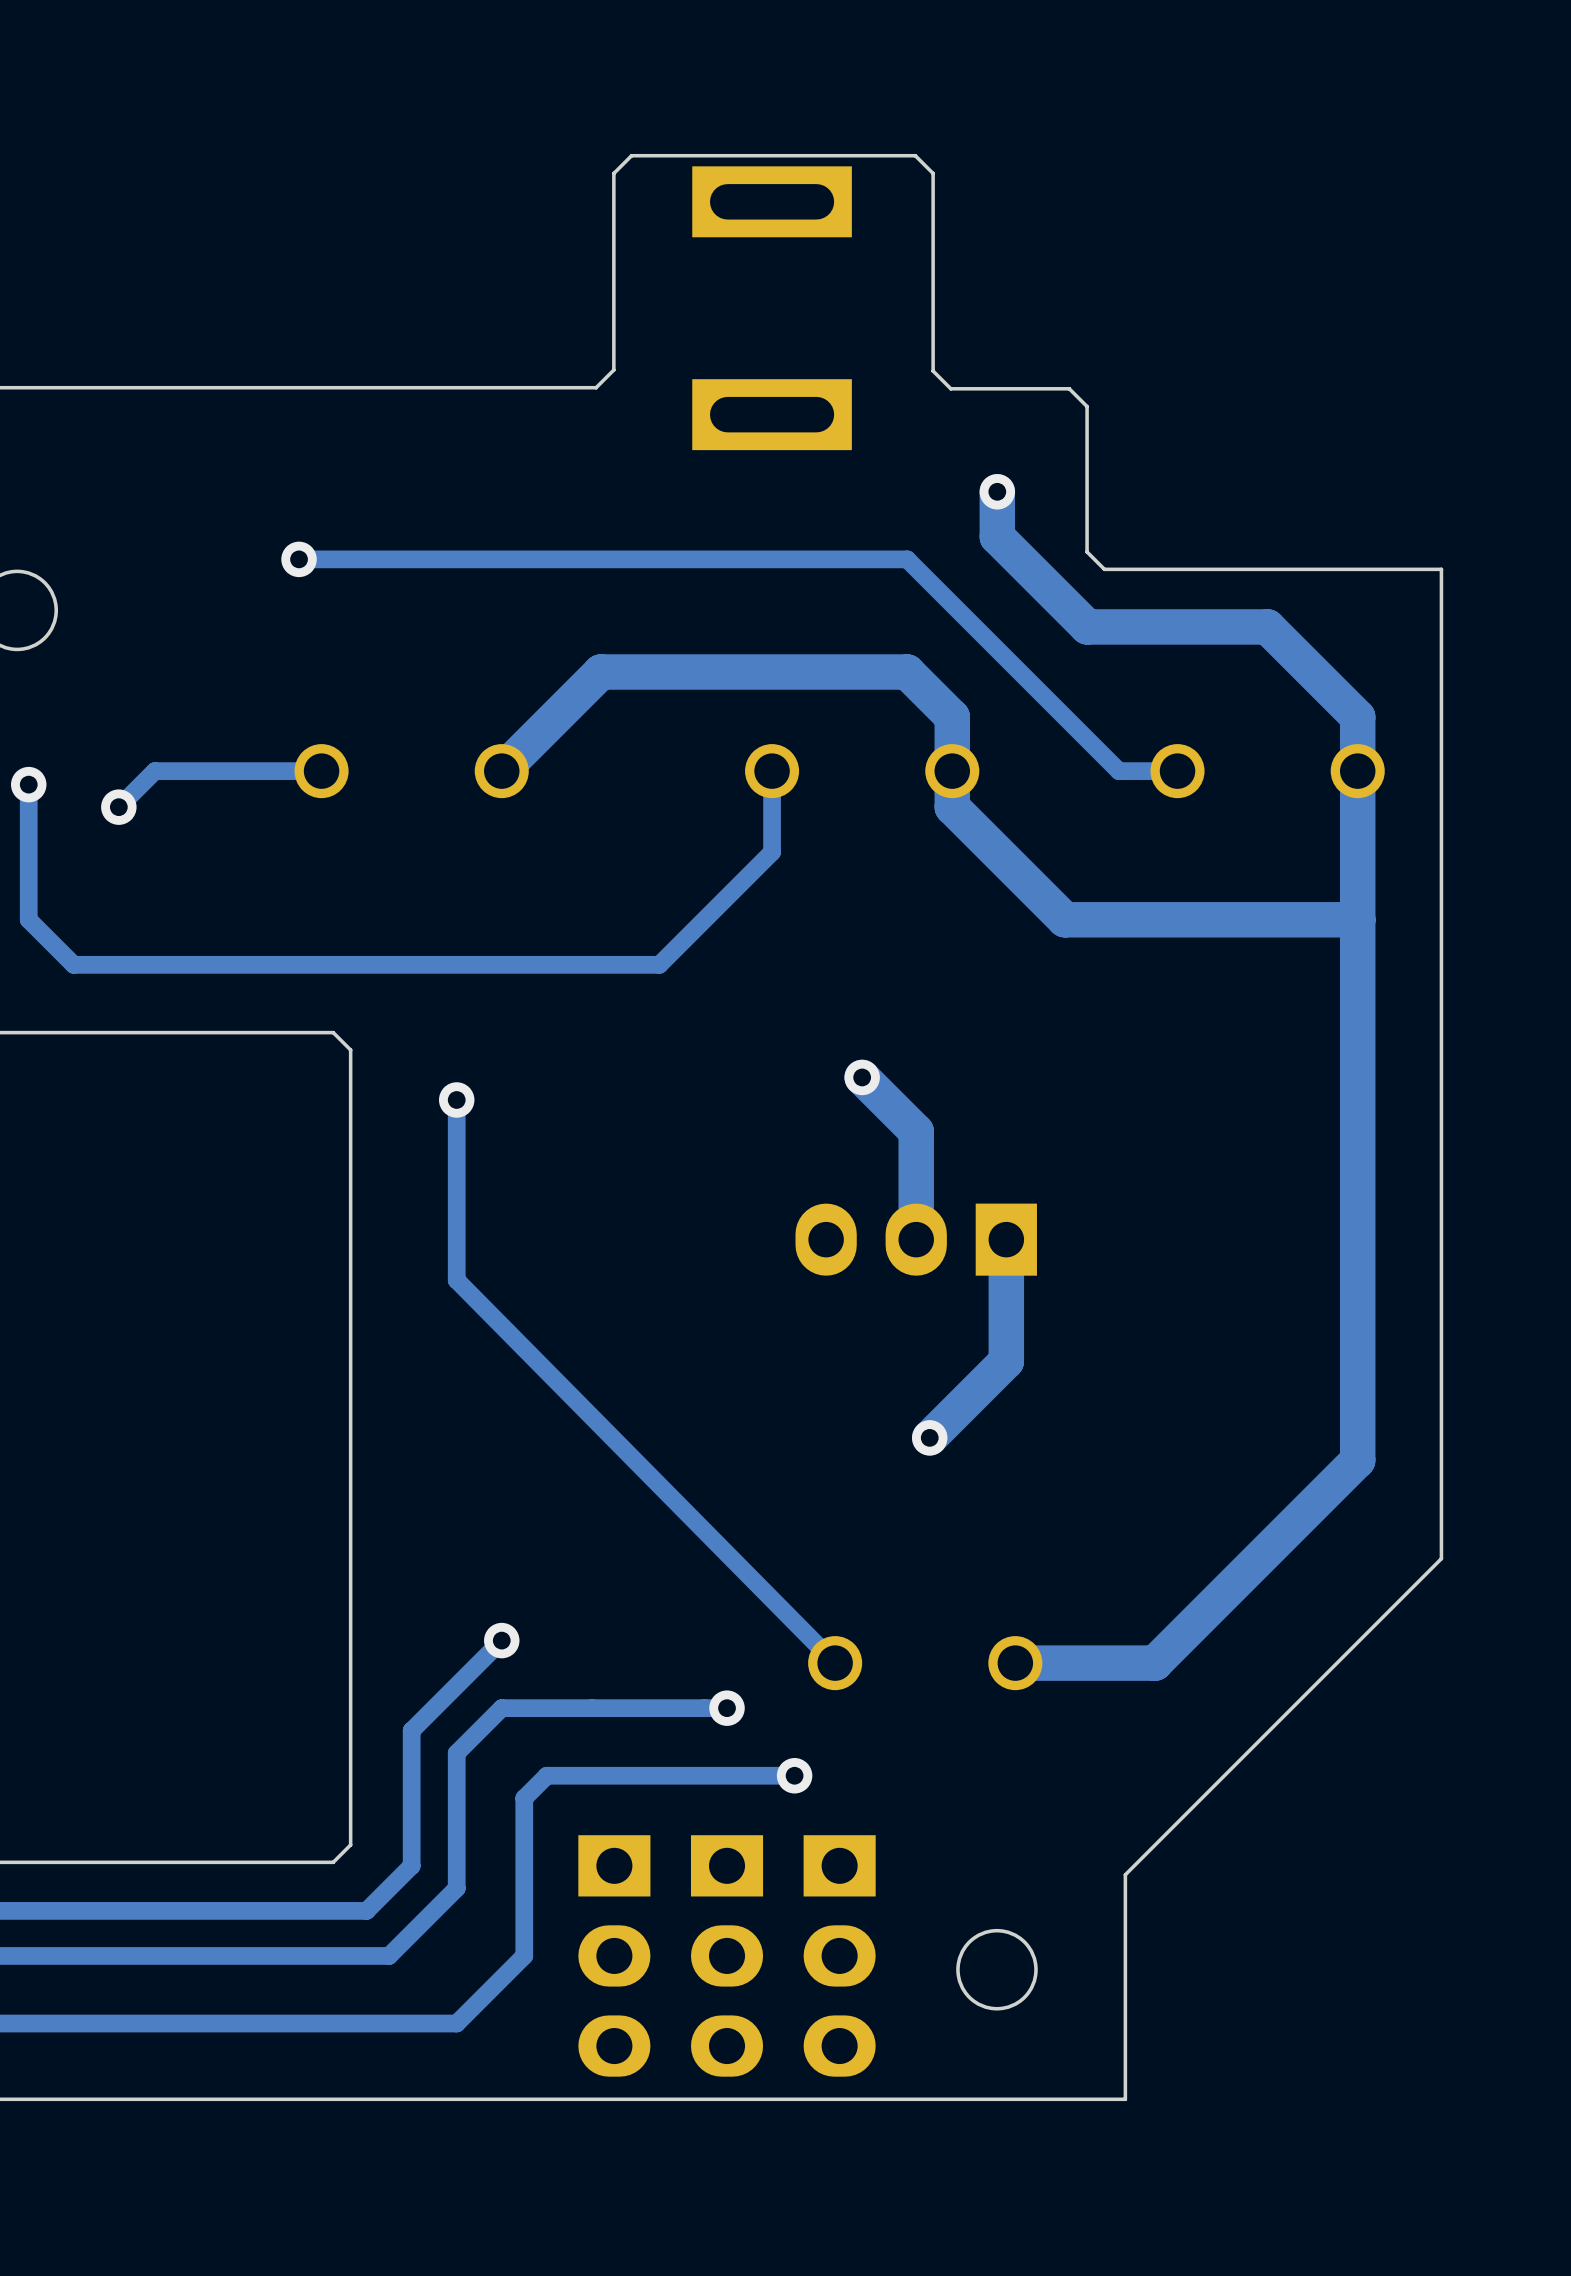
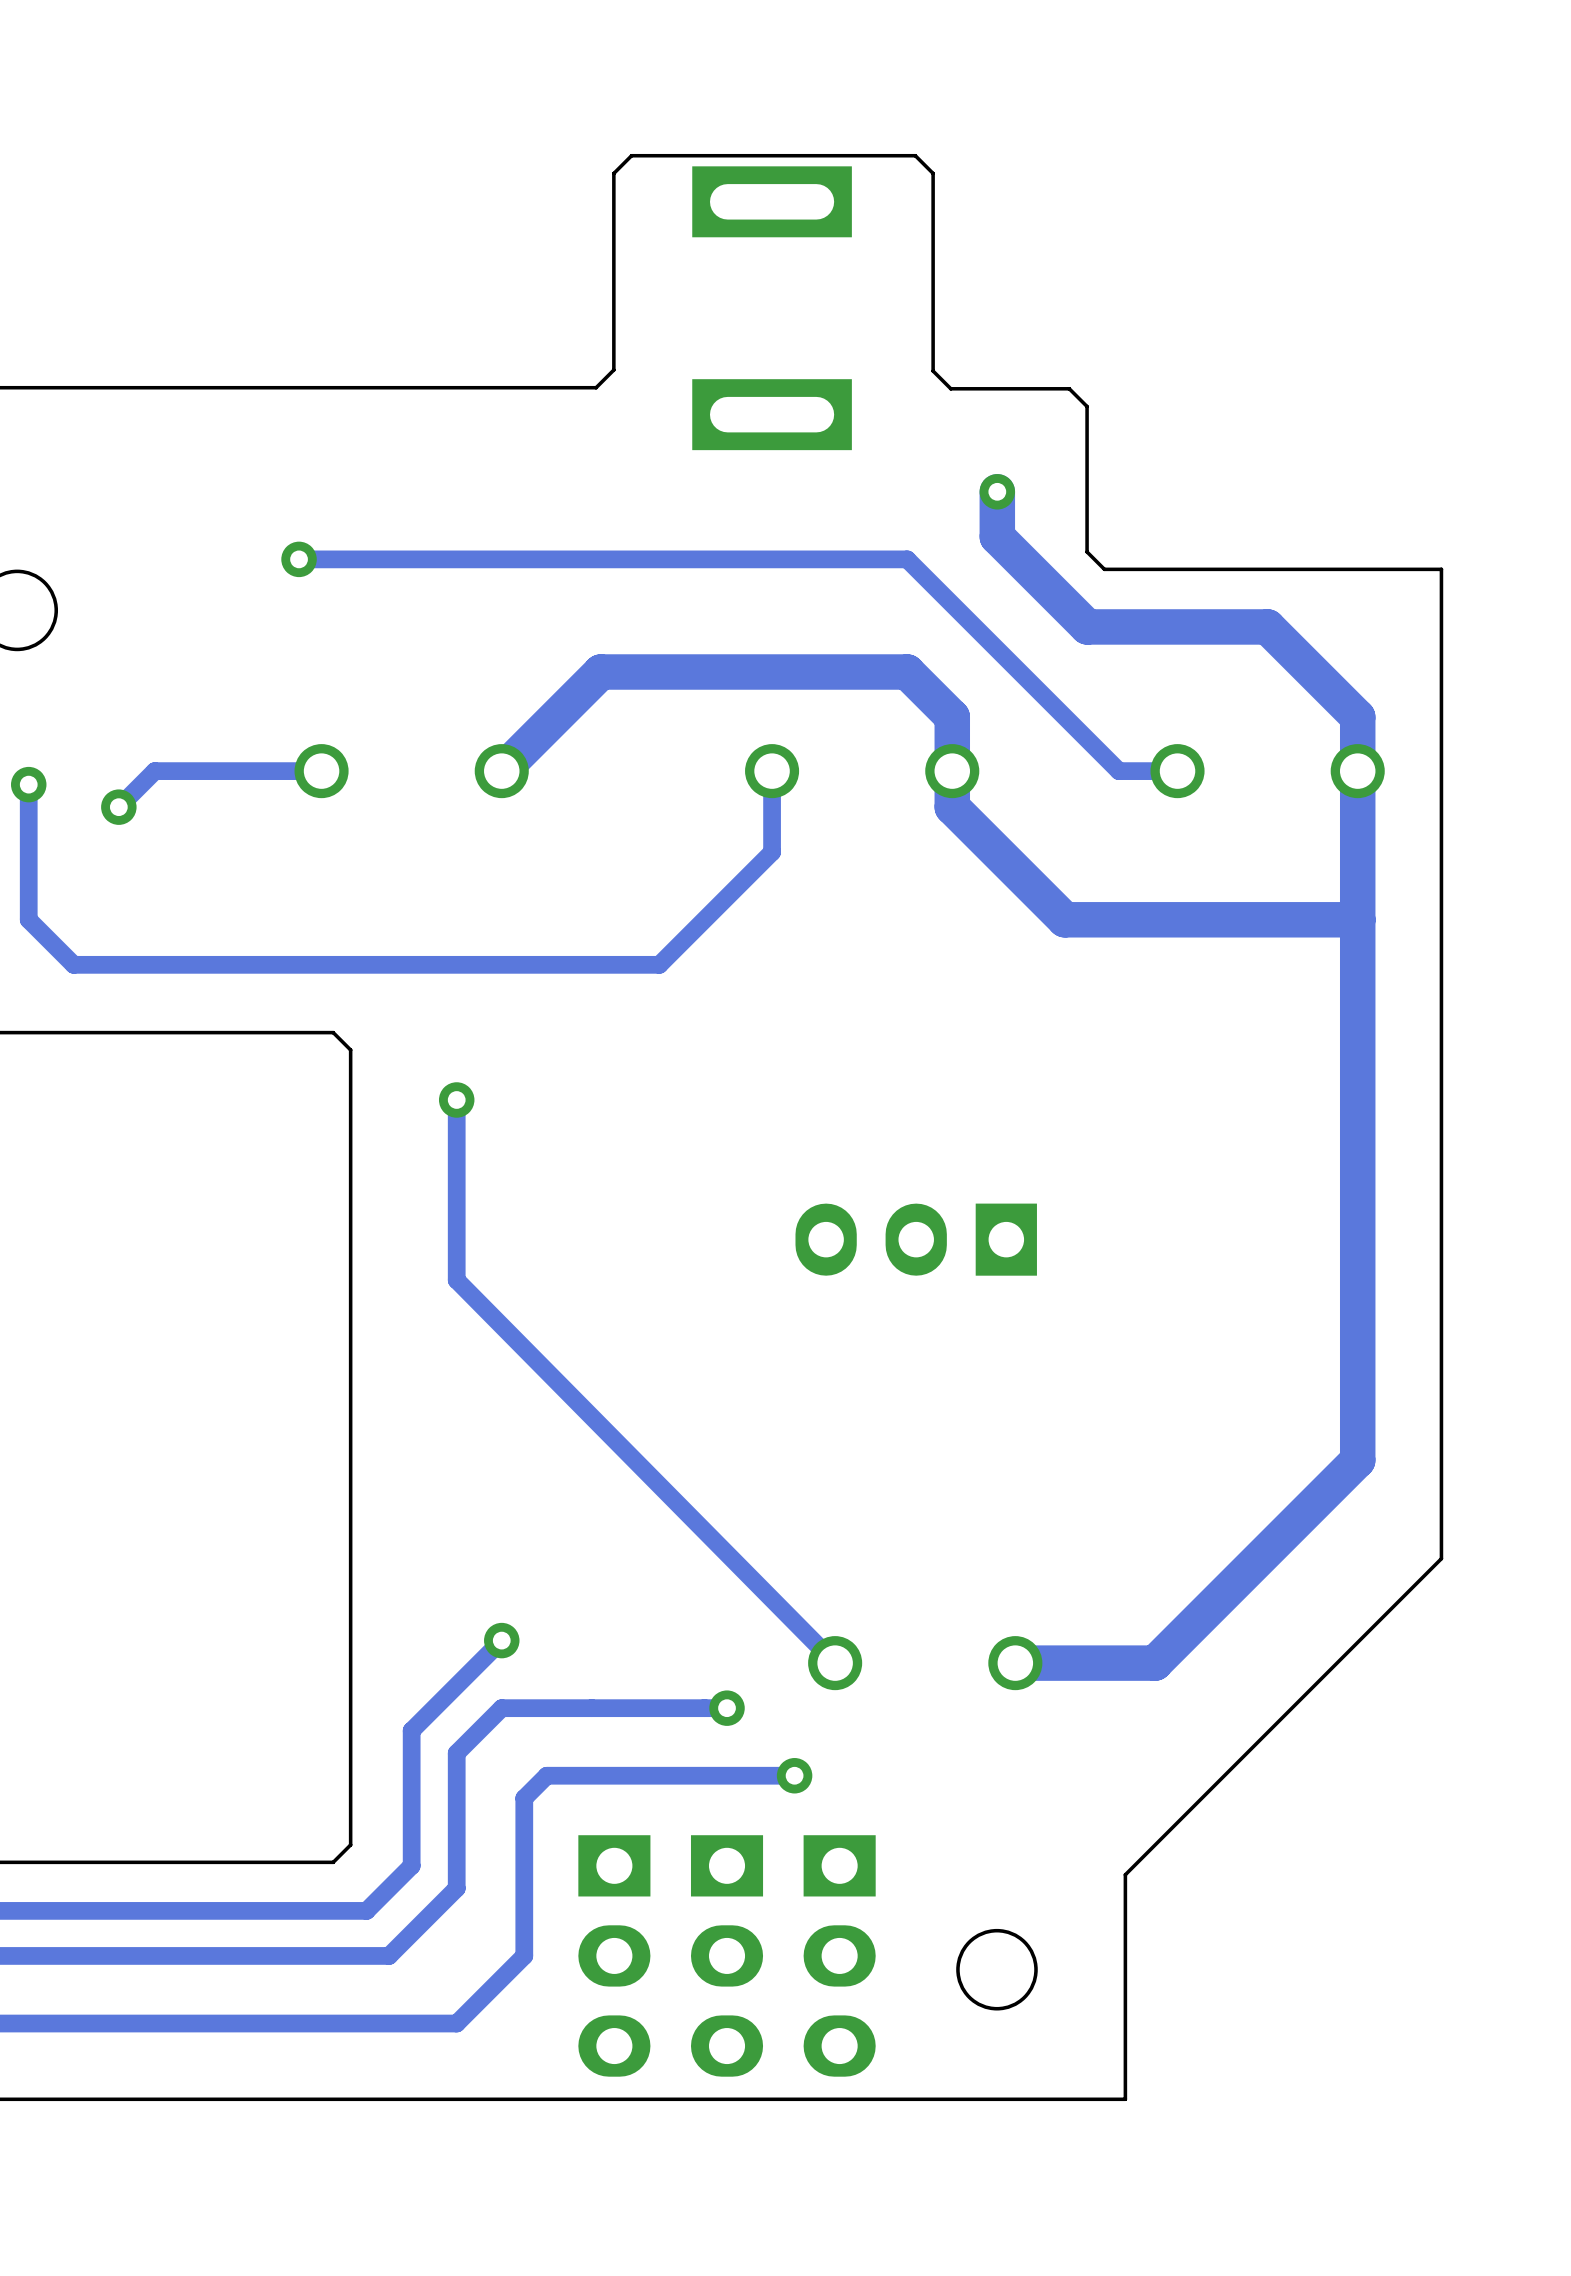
track: (862, 1077) (916, 1131) (916, 1239) -> none
via: (862, 1077) -> none
track: (1006, 1239) (1006, 1361) (929, 1437) -> none
via: (929, 1437) -> none

